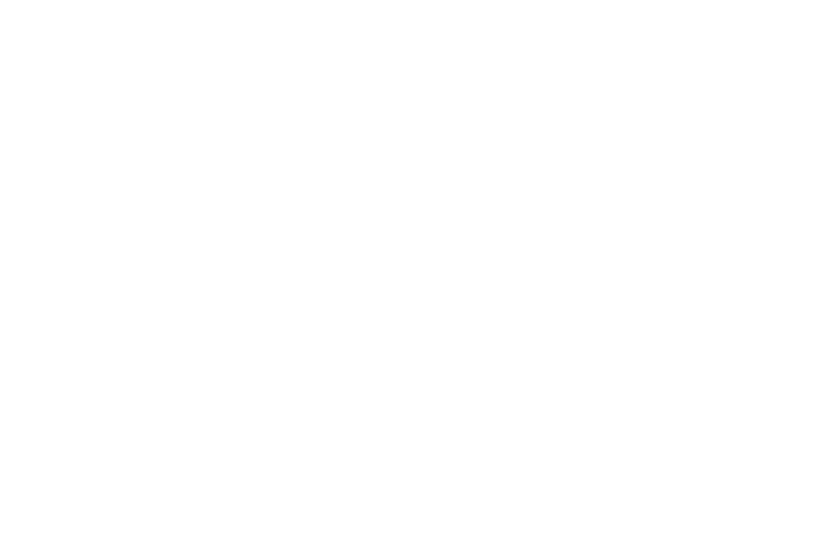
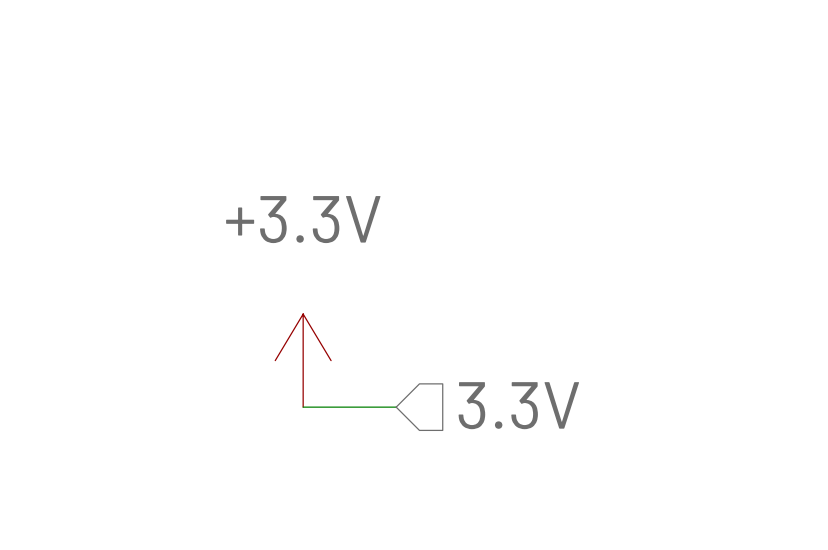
power symbol: none -> +3.3V (303, 360)
hierarchical label: none -> 3.3V (518, 405)
wire: none -> (303, 407) (396, 407)

